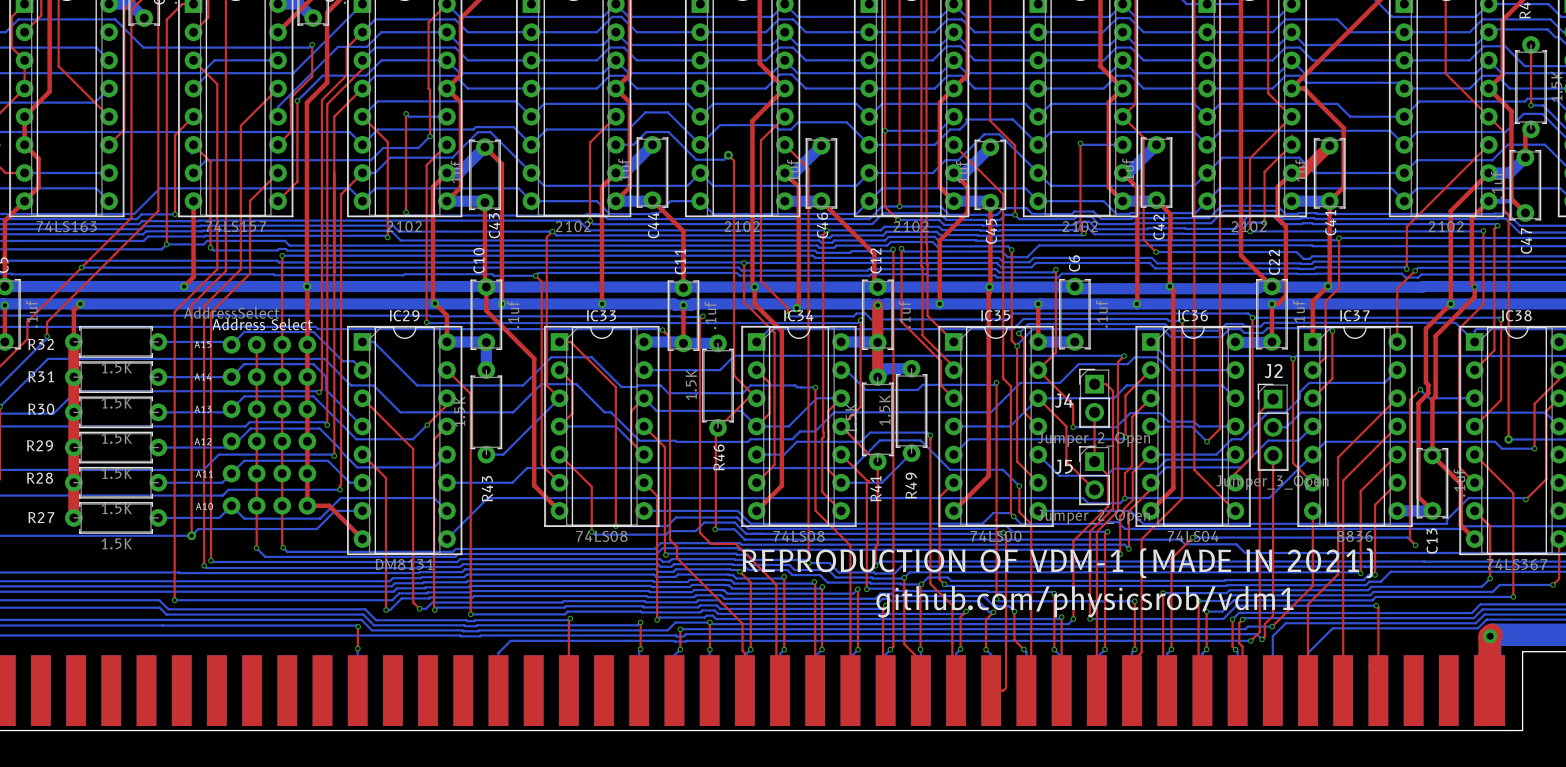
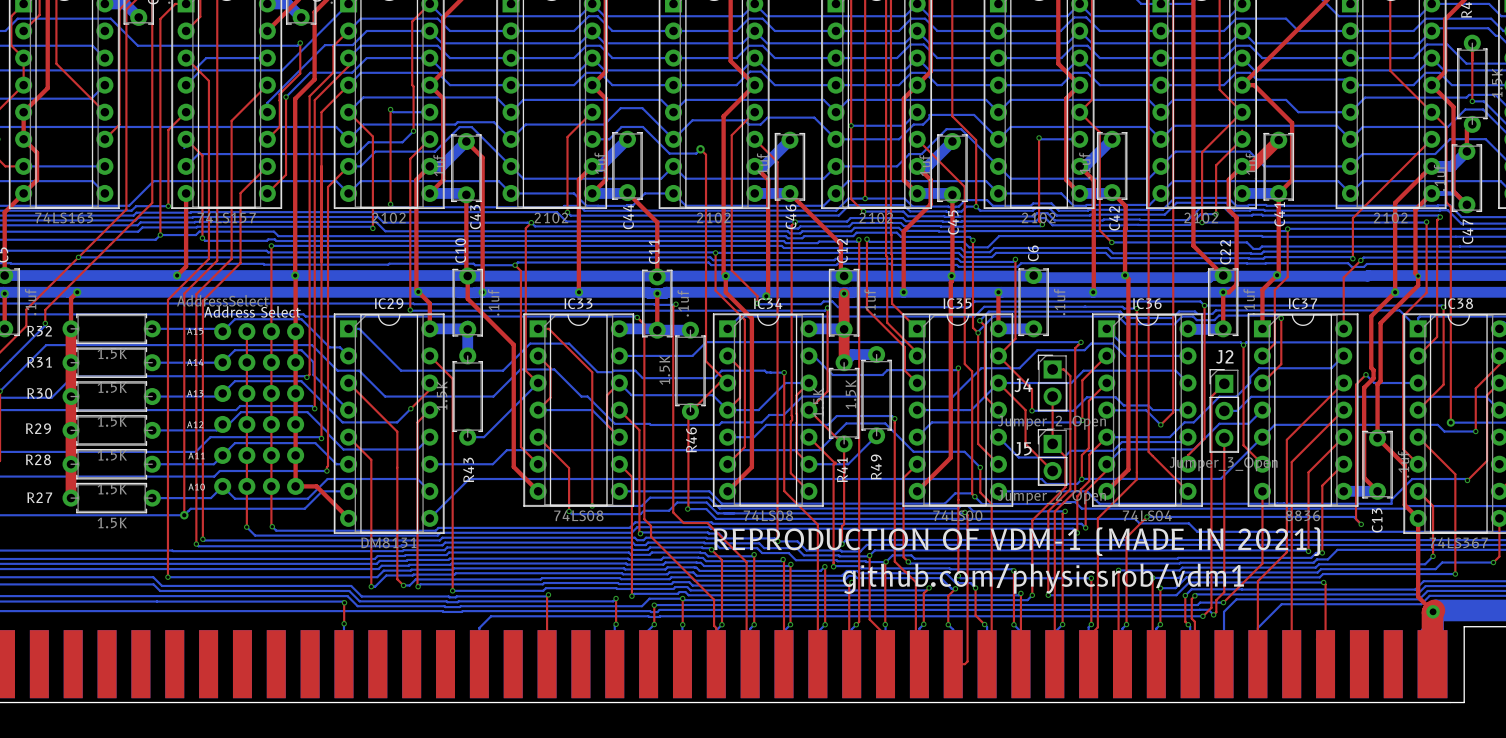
top track: none -> (1418, 518) (1418, 596) (1433, 611)

